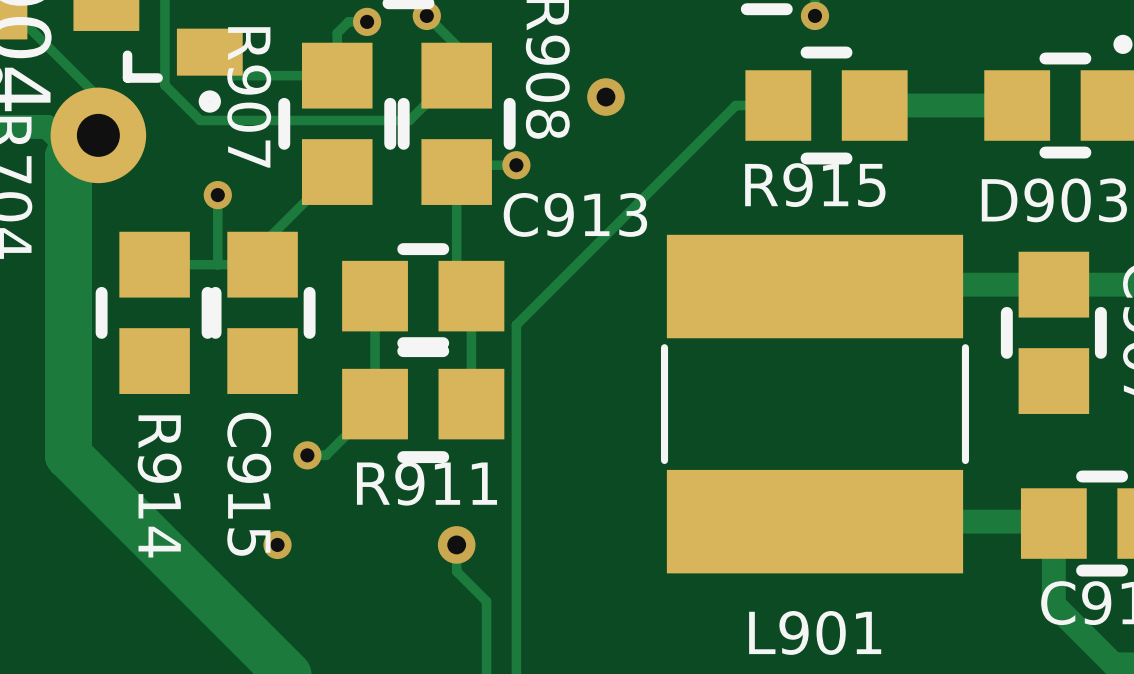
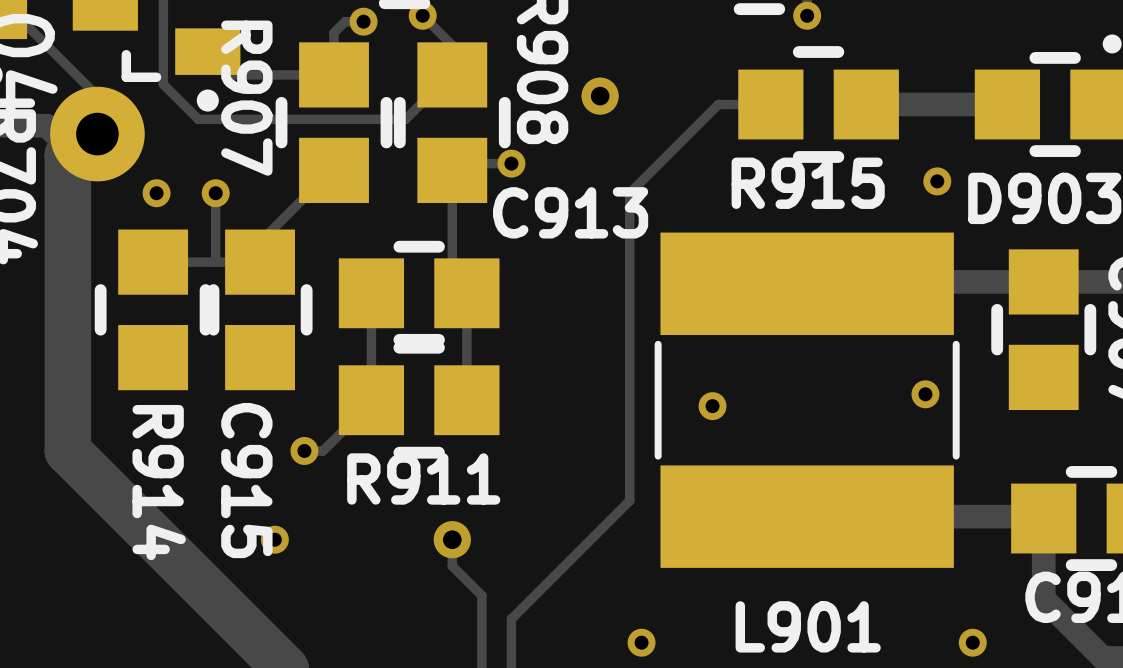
track: (735, 105) (516, 324) (516, 625) -> (728, 104) (718, 104) (629, 193) (629, 500) (511, 619)
via: none -> (937, 181)
via: none -> (156, 193)
via: none -> (925, 394)
via: none -> (712, 406)
via: none -> (641, 642)
via: none -> (972, 642)

